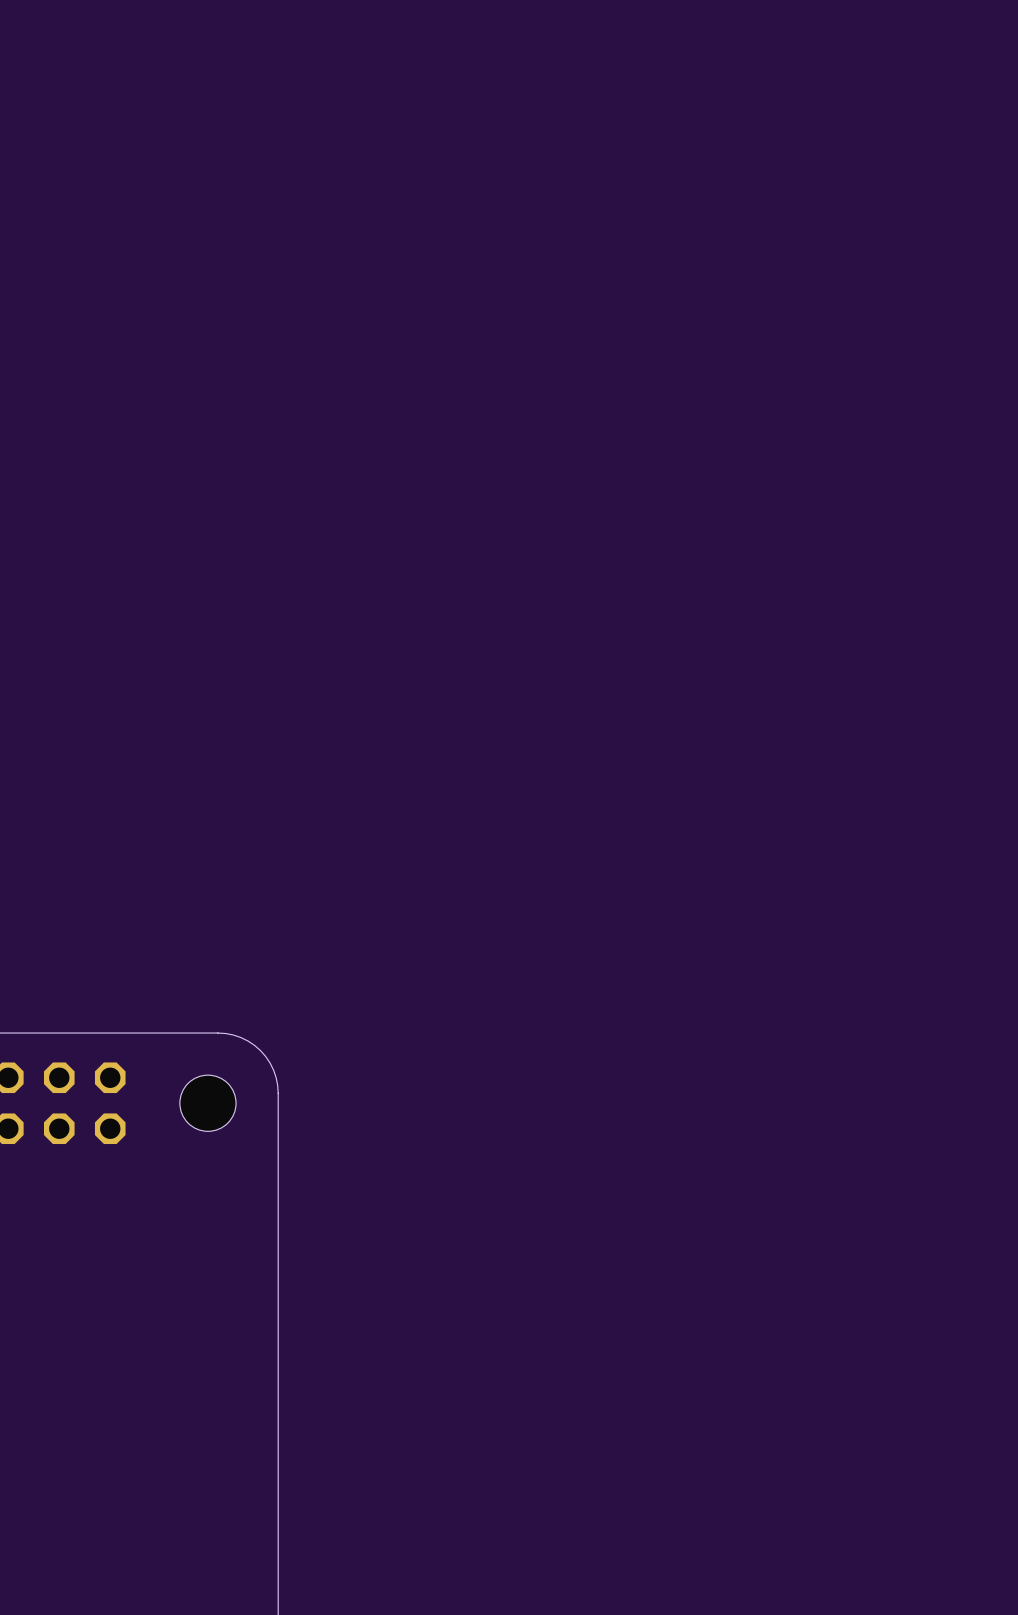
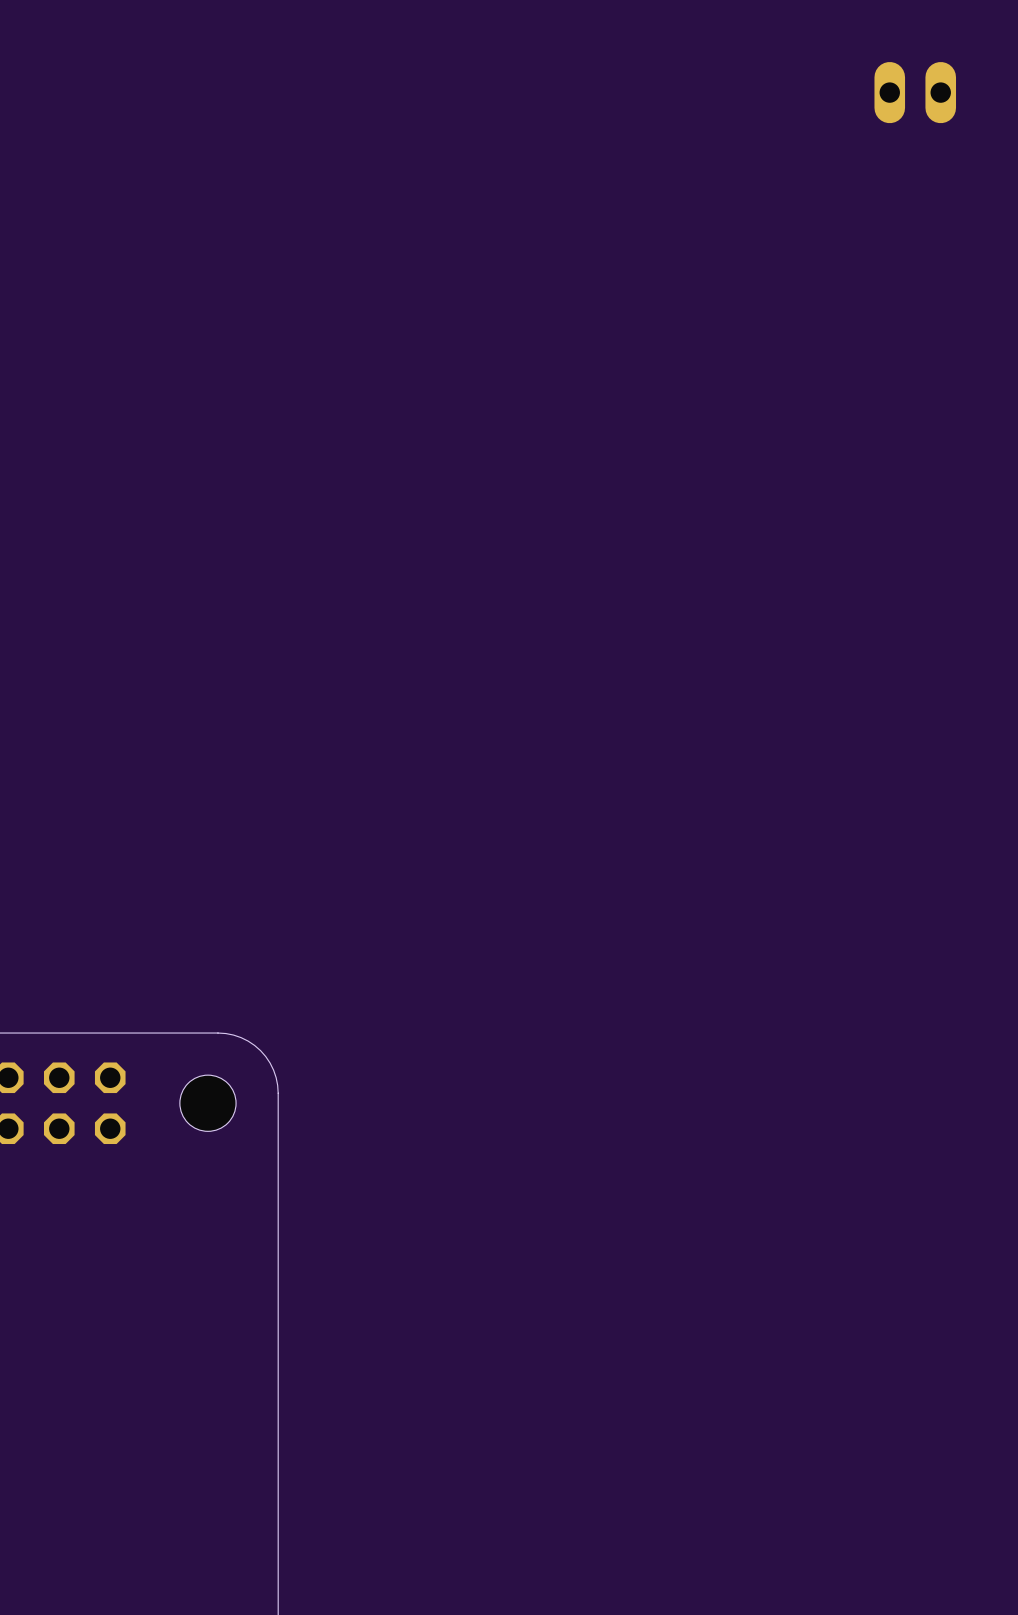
part: none -> (915, 92)

